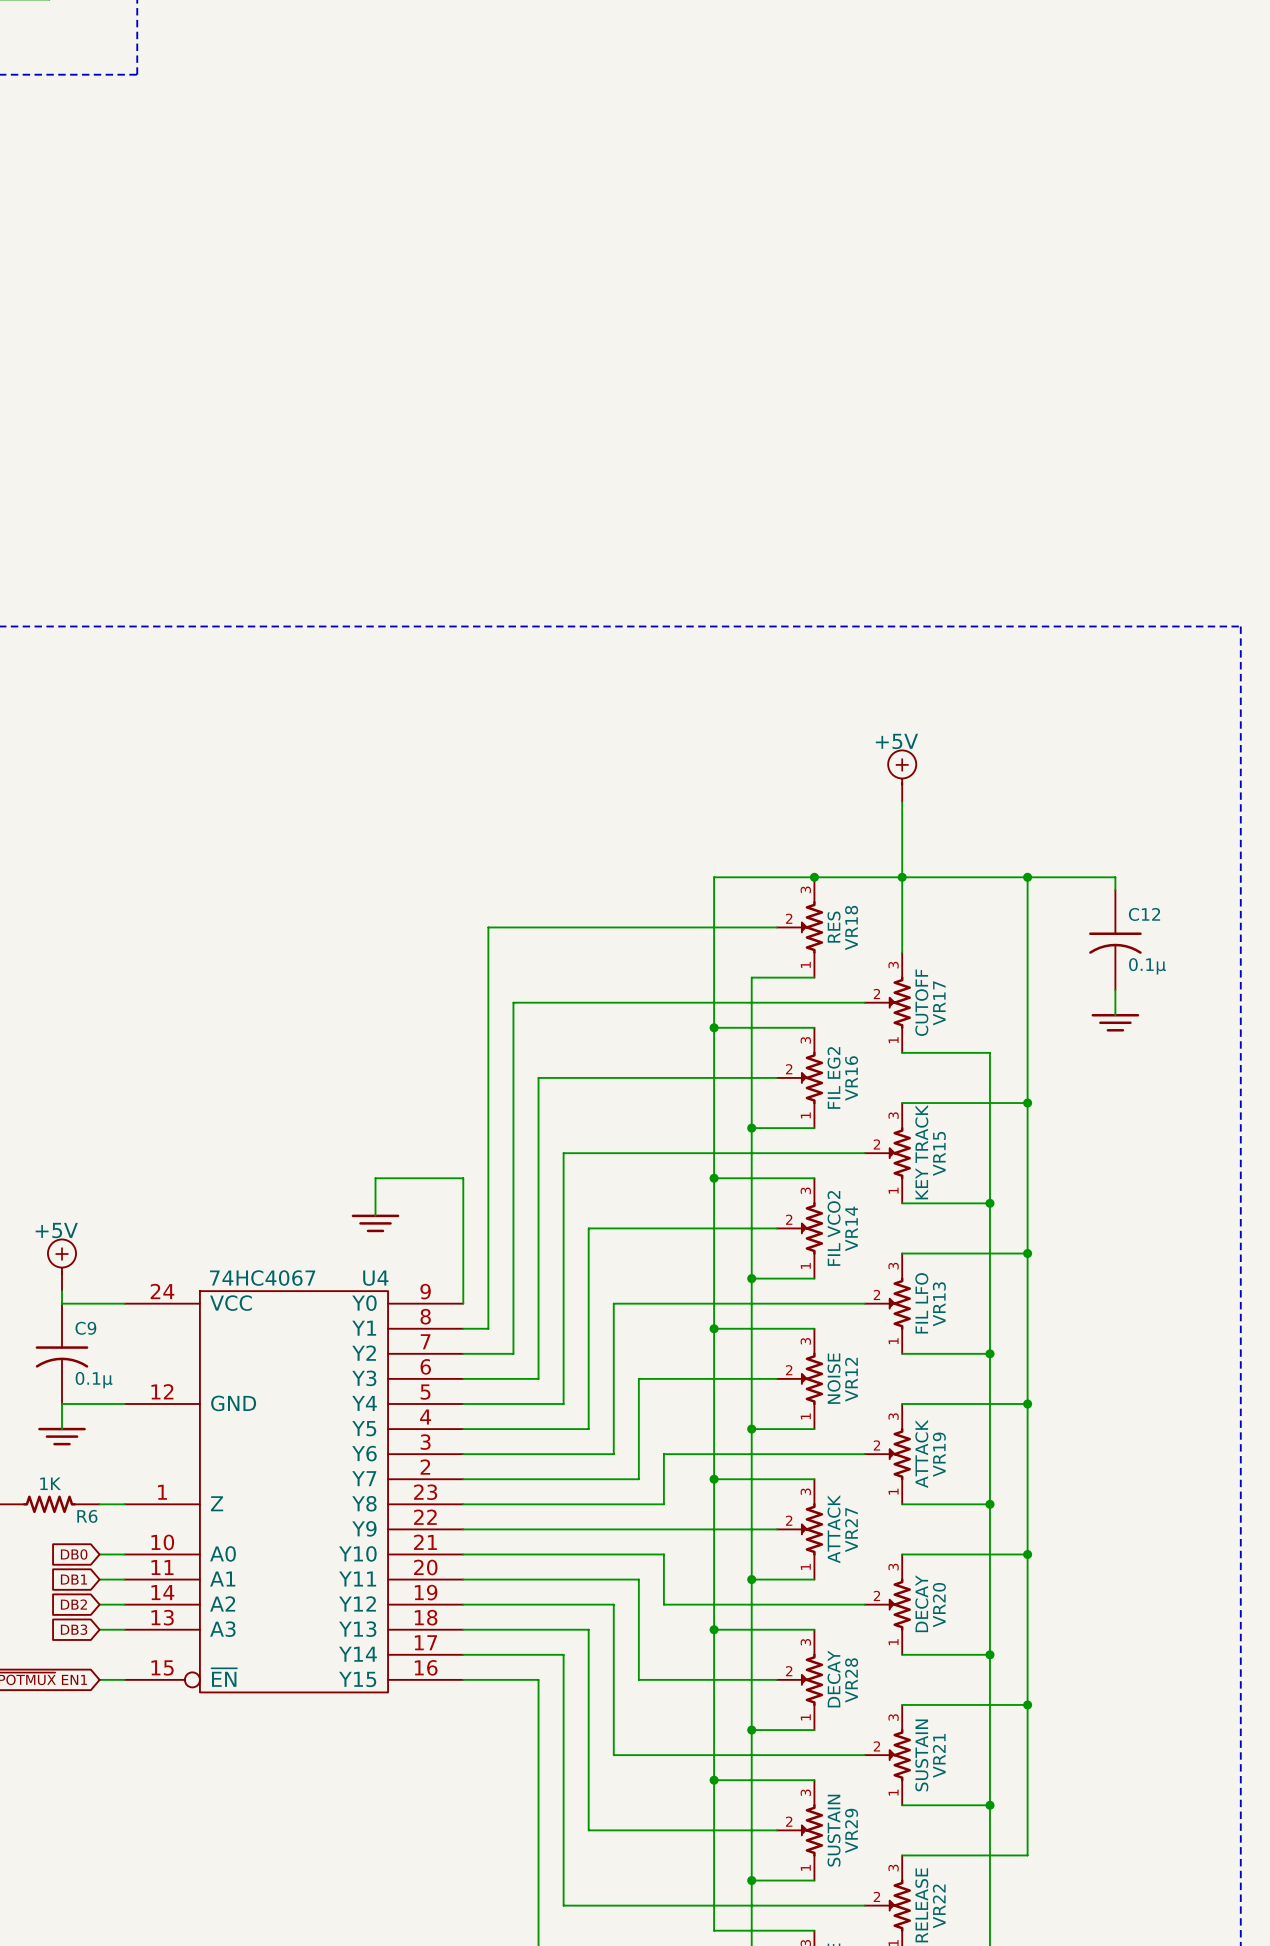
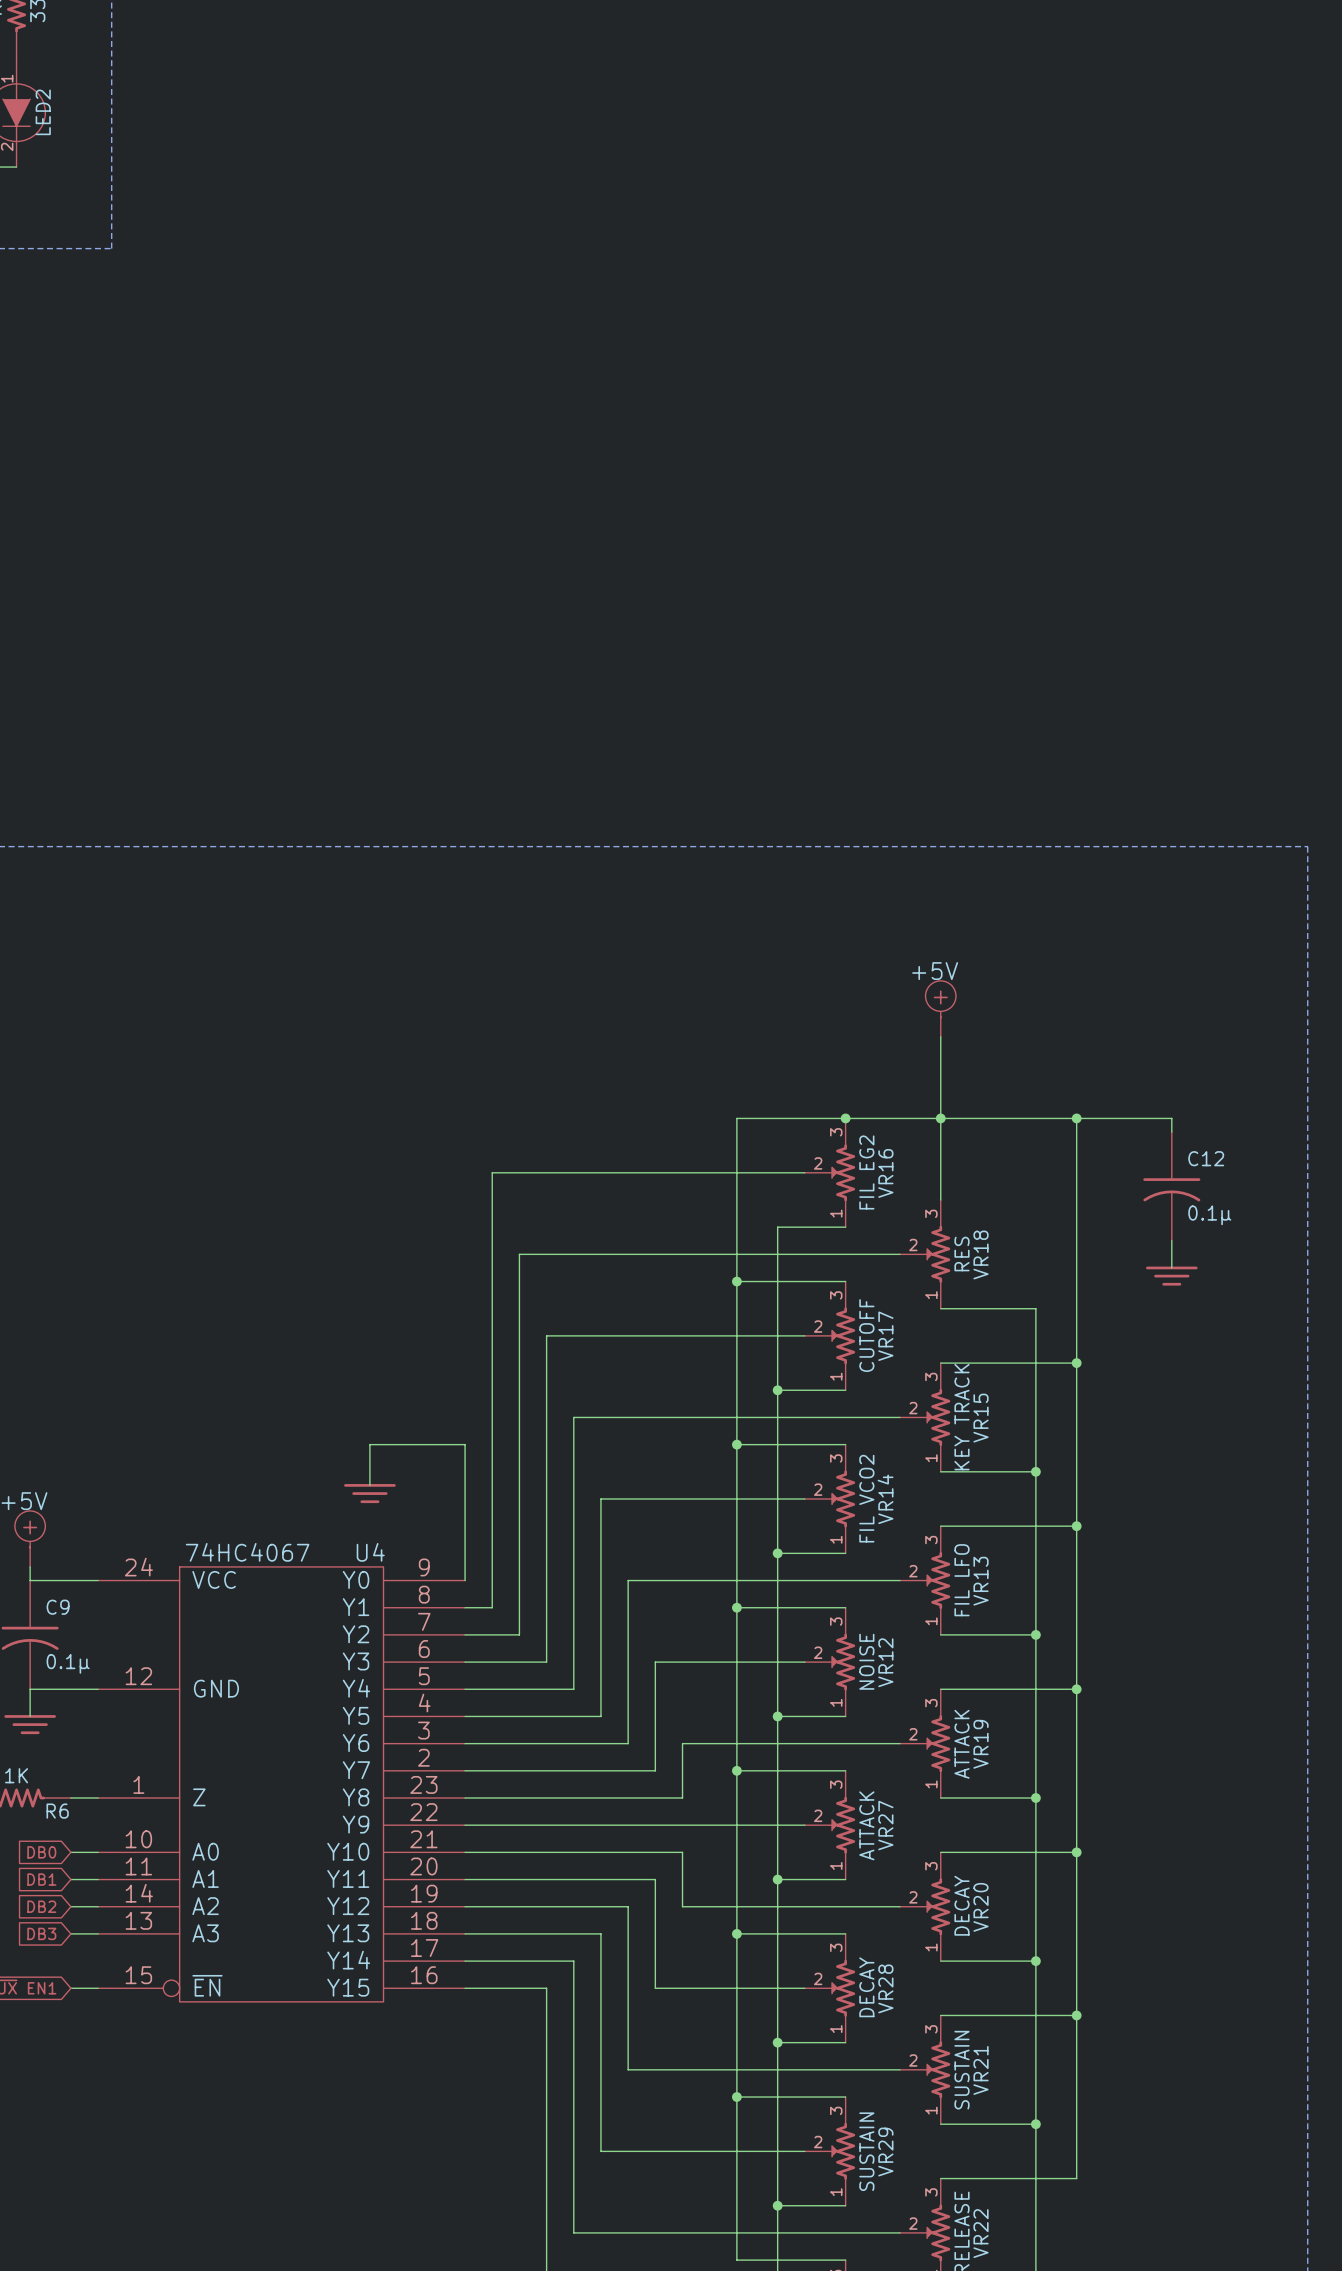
VR18 value: RES (834, 927) -> FIL EG2 (866, 1172)
VR18 name: VR18 (851, 927) -> VR16 (885, 1173)
VR17 value: CUTOFF (921, 1002) -> RES (961, 1254)
VR17 name: VR17 (939, 1003) -> VR18 (981, 1255)
VR16 value: FIL EG2 (834, 1077) -> CUTOFF (866, 1335)
VR16 name: VR16 (851, 1078) -> VR17 (885, 1336)

